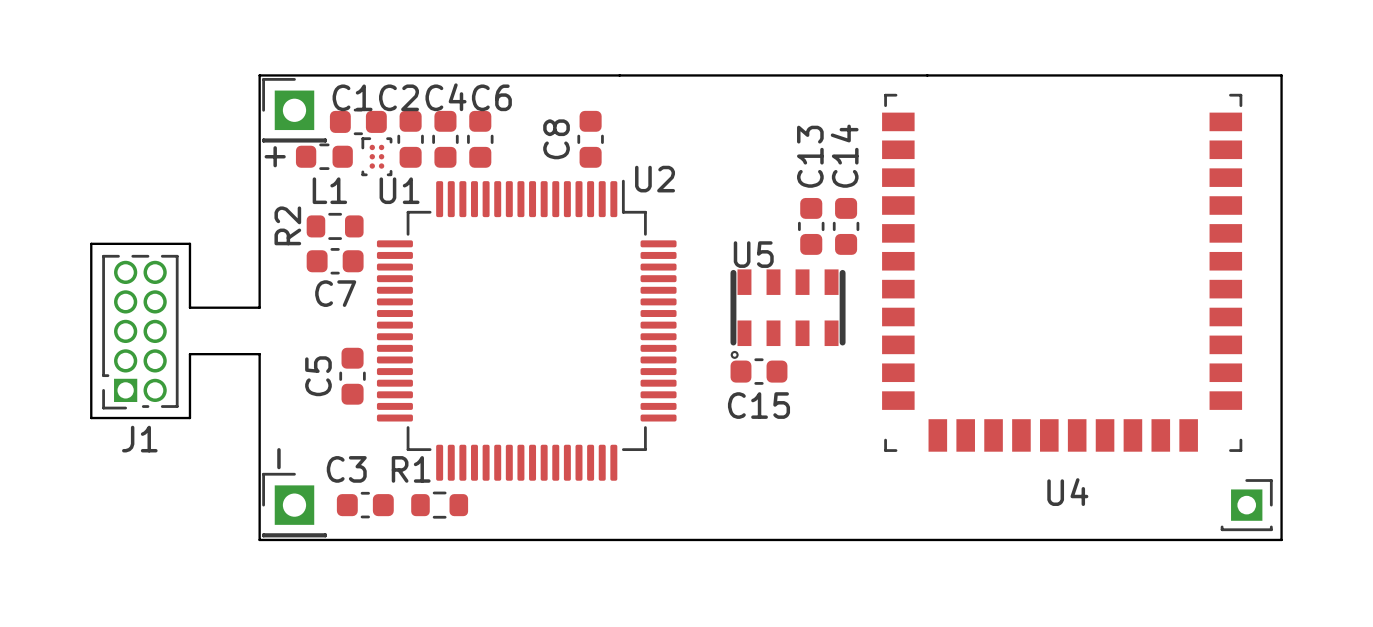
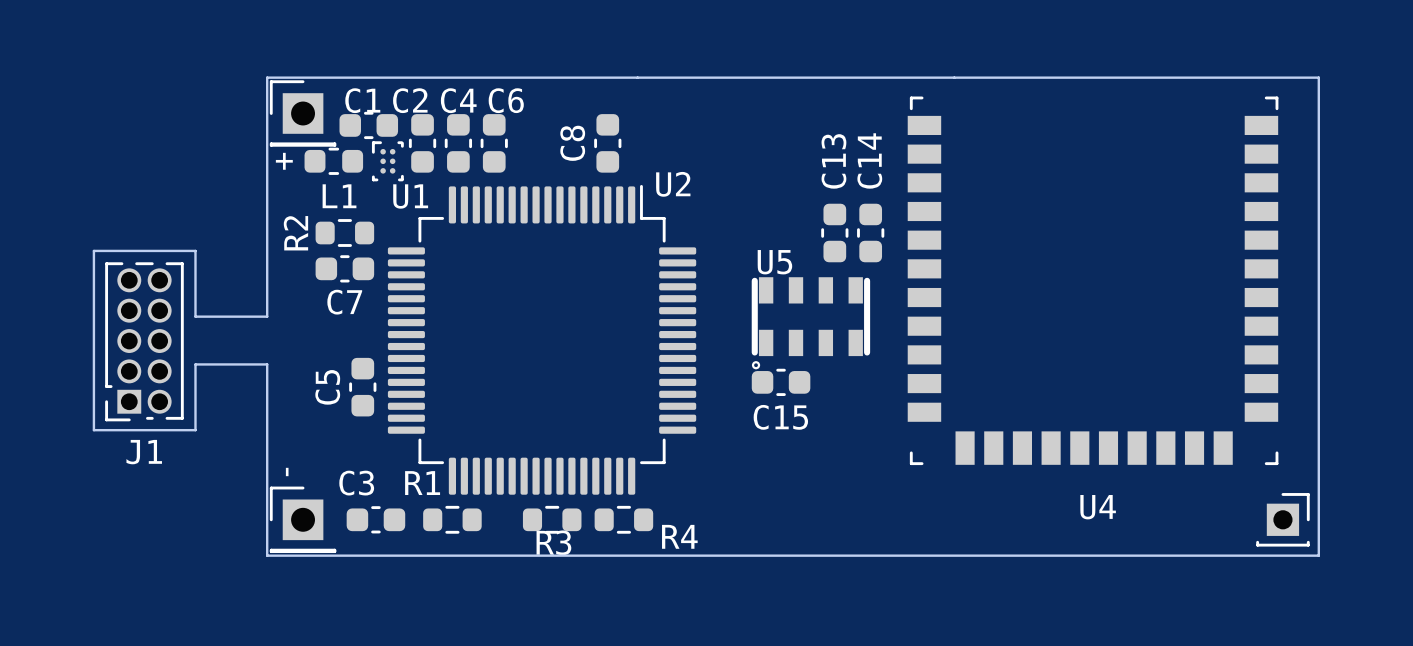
R4: none -> (552, 519)
R3: none -> (623, 519)

